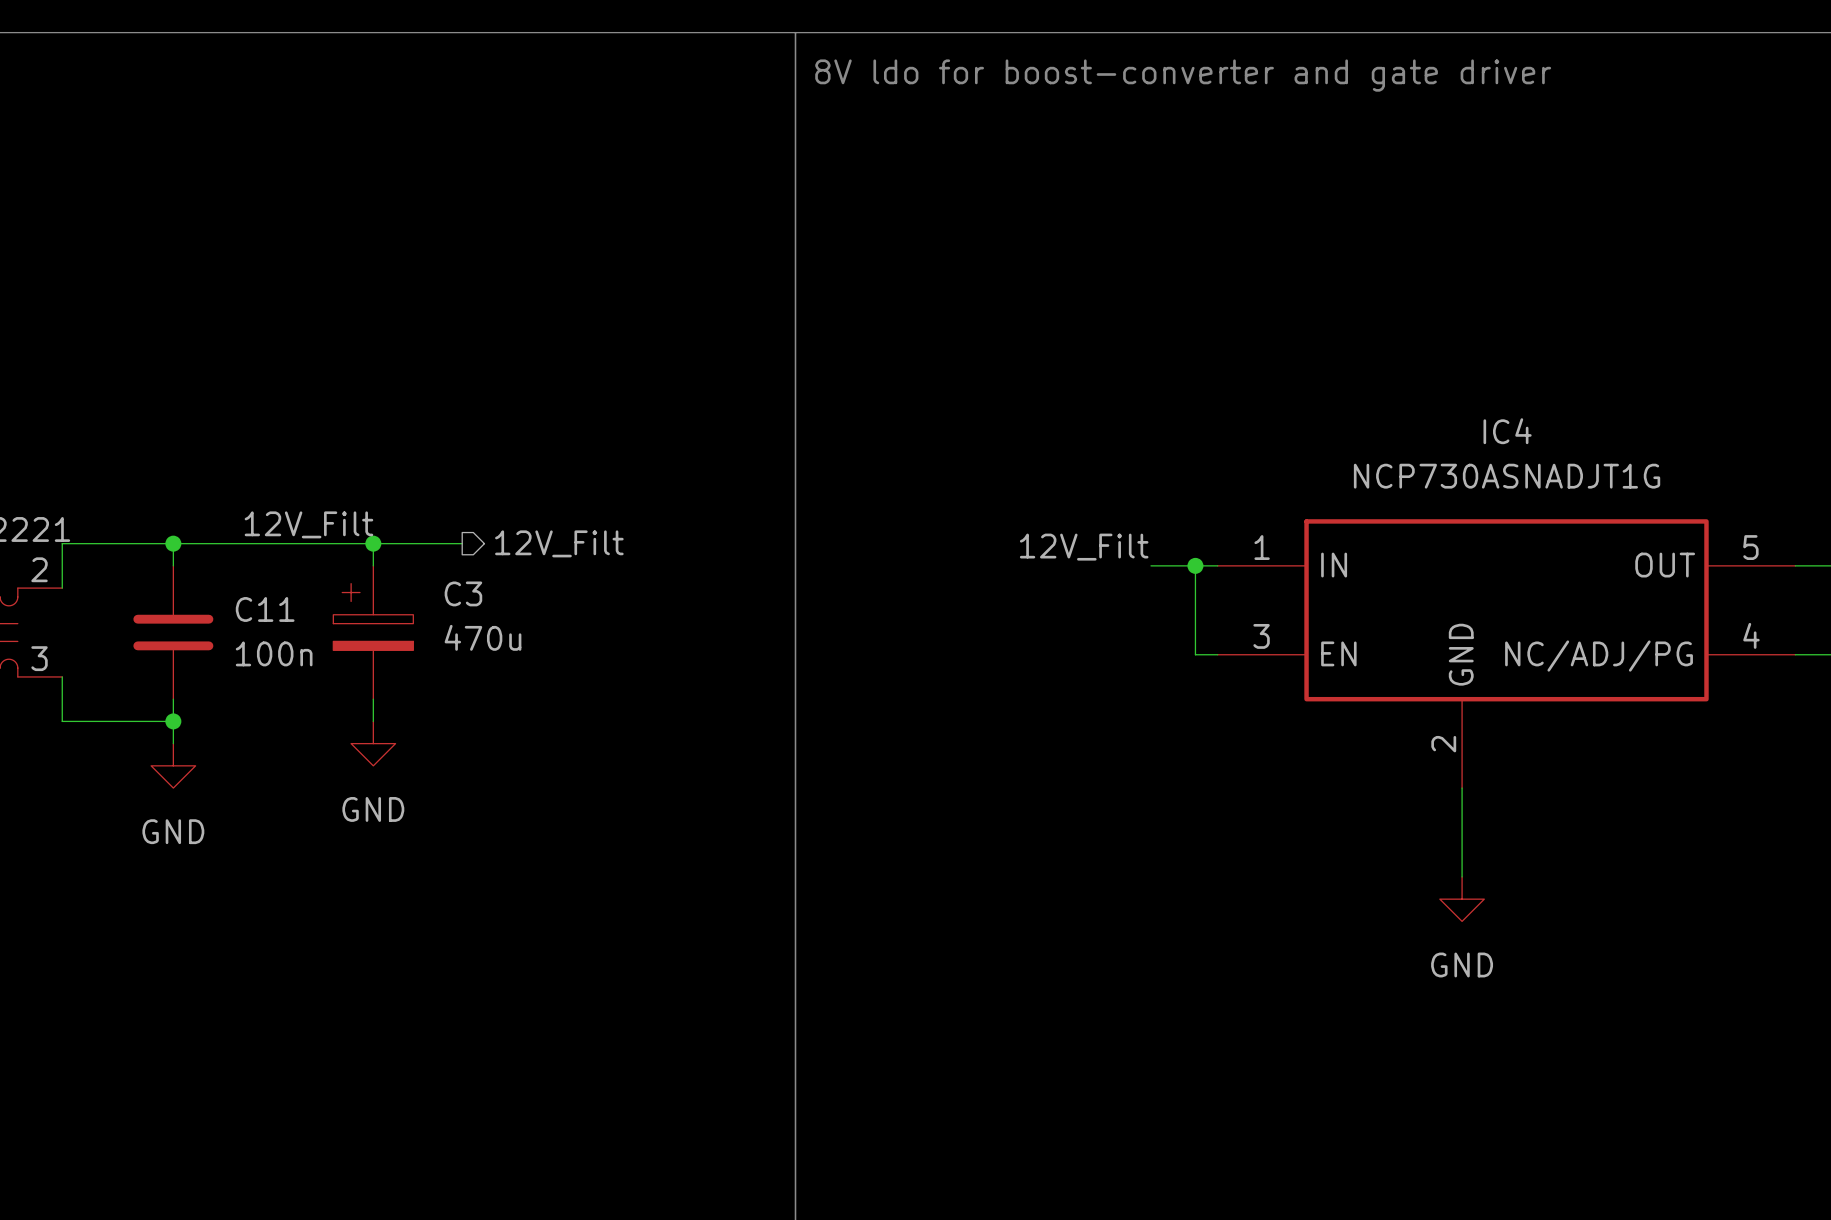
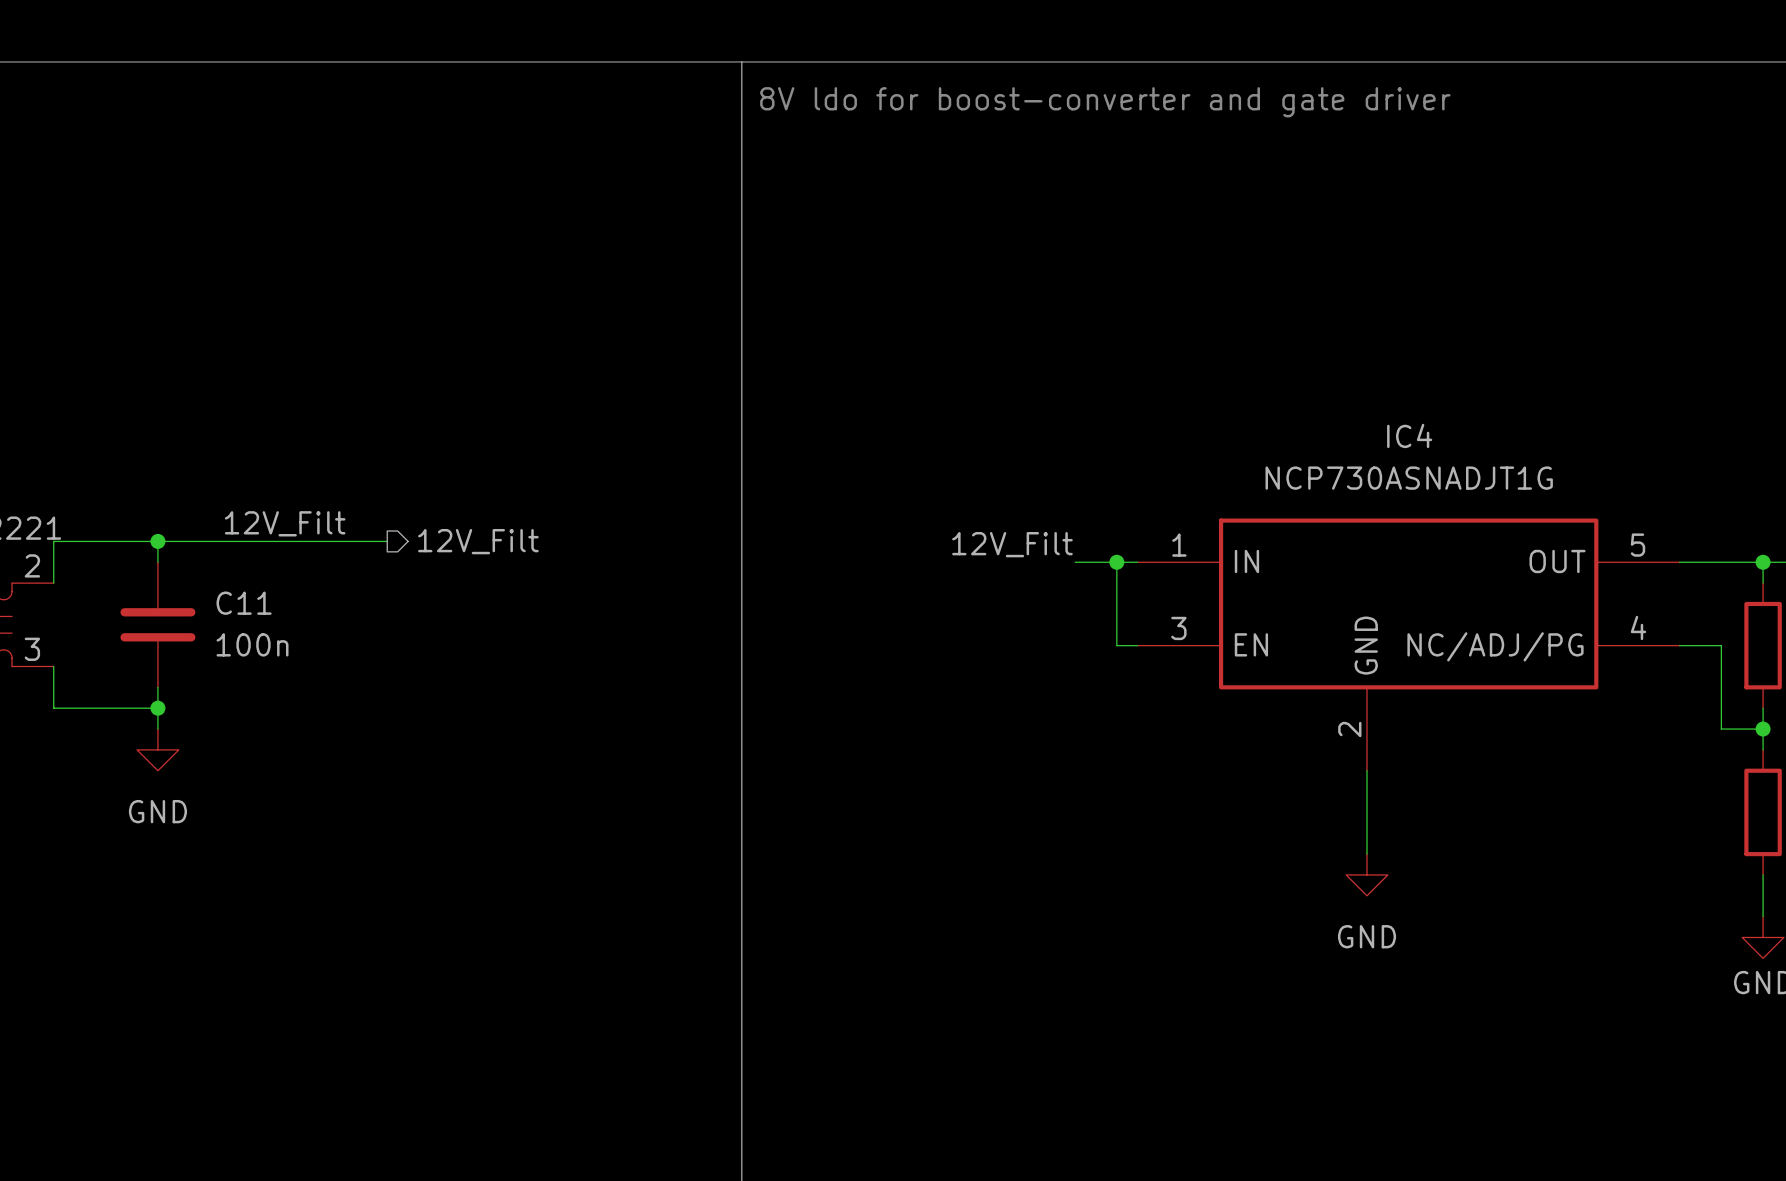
wire: (373, 543) (373, 565) -> none
junction: (373, 543) -> none
wire: (417, 543) (462, 543) -> none
hierarchical label position: 12V_Filt (559, 543) -> 12V_Filt (478, 541)
C3: 470u (373, 632) -> none
wire: (373, 699) (373, 721) -> none
power symbol: GND (373, 743) -> none

